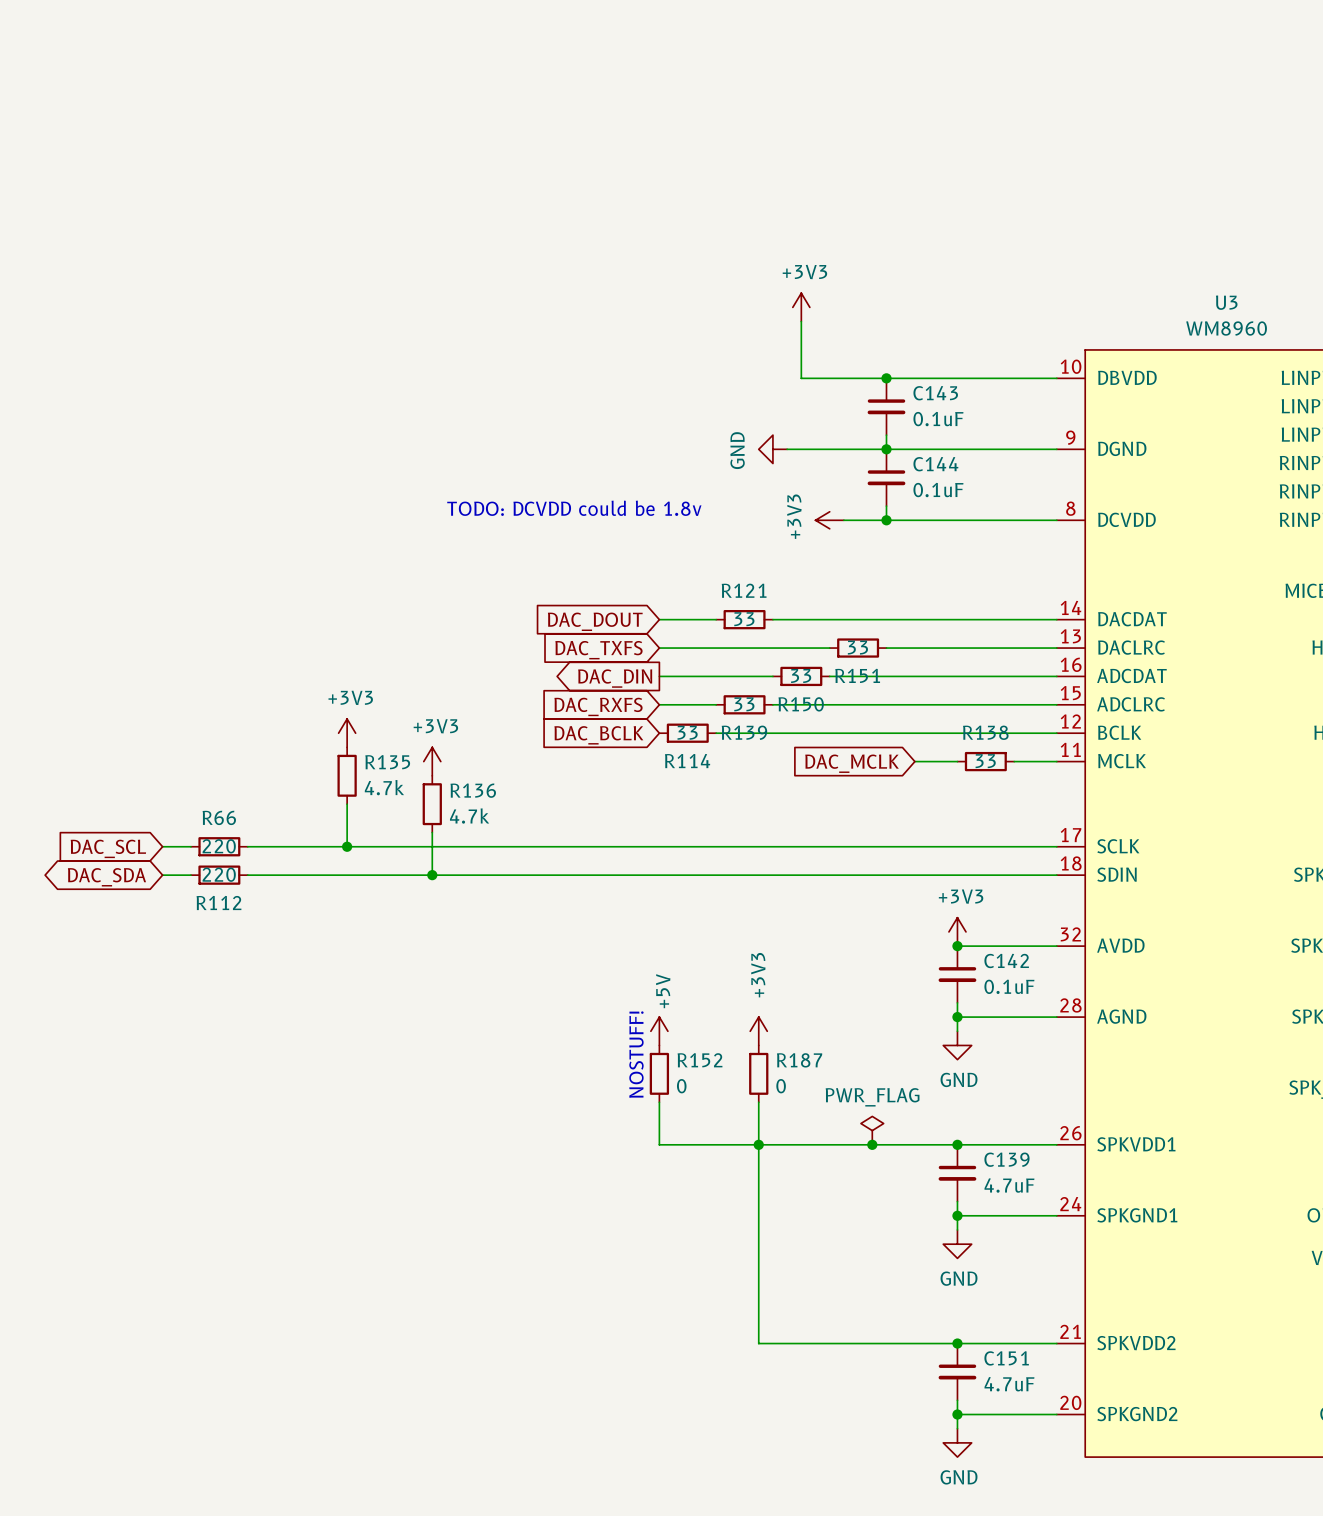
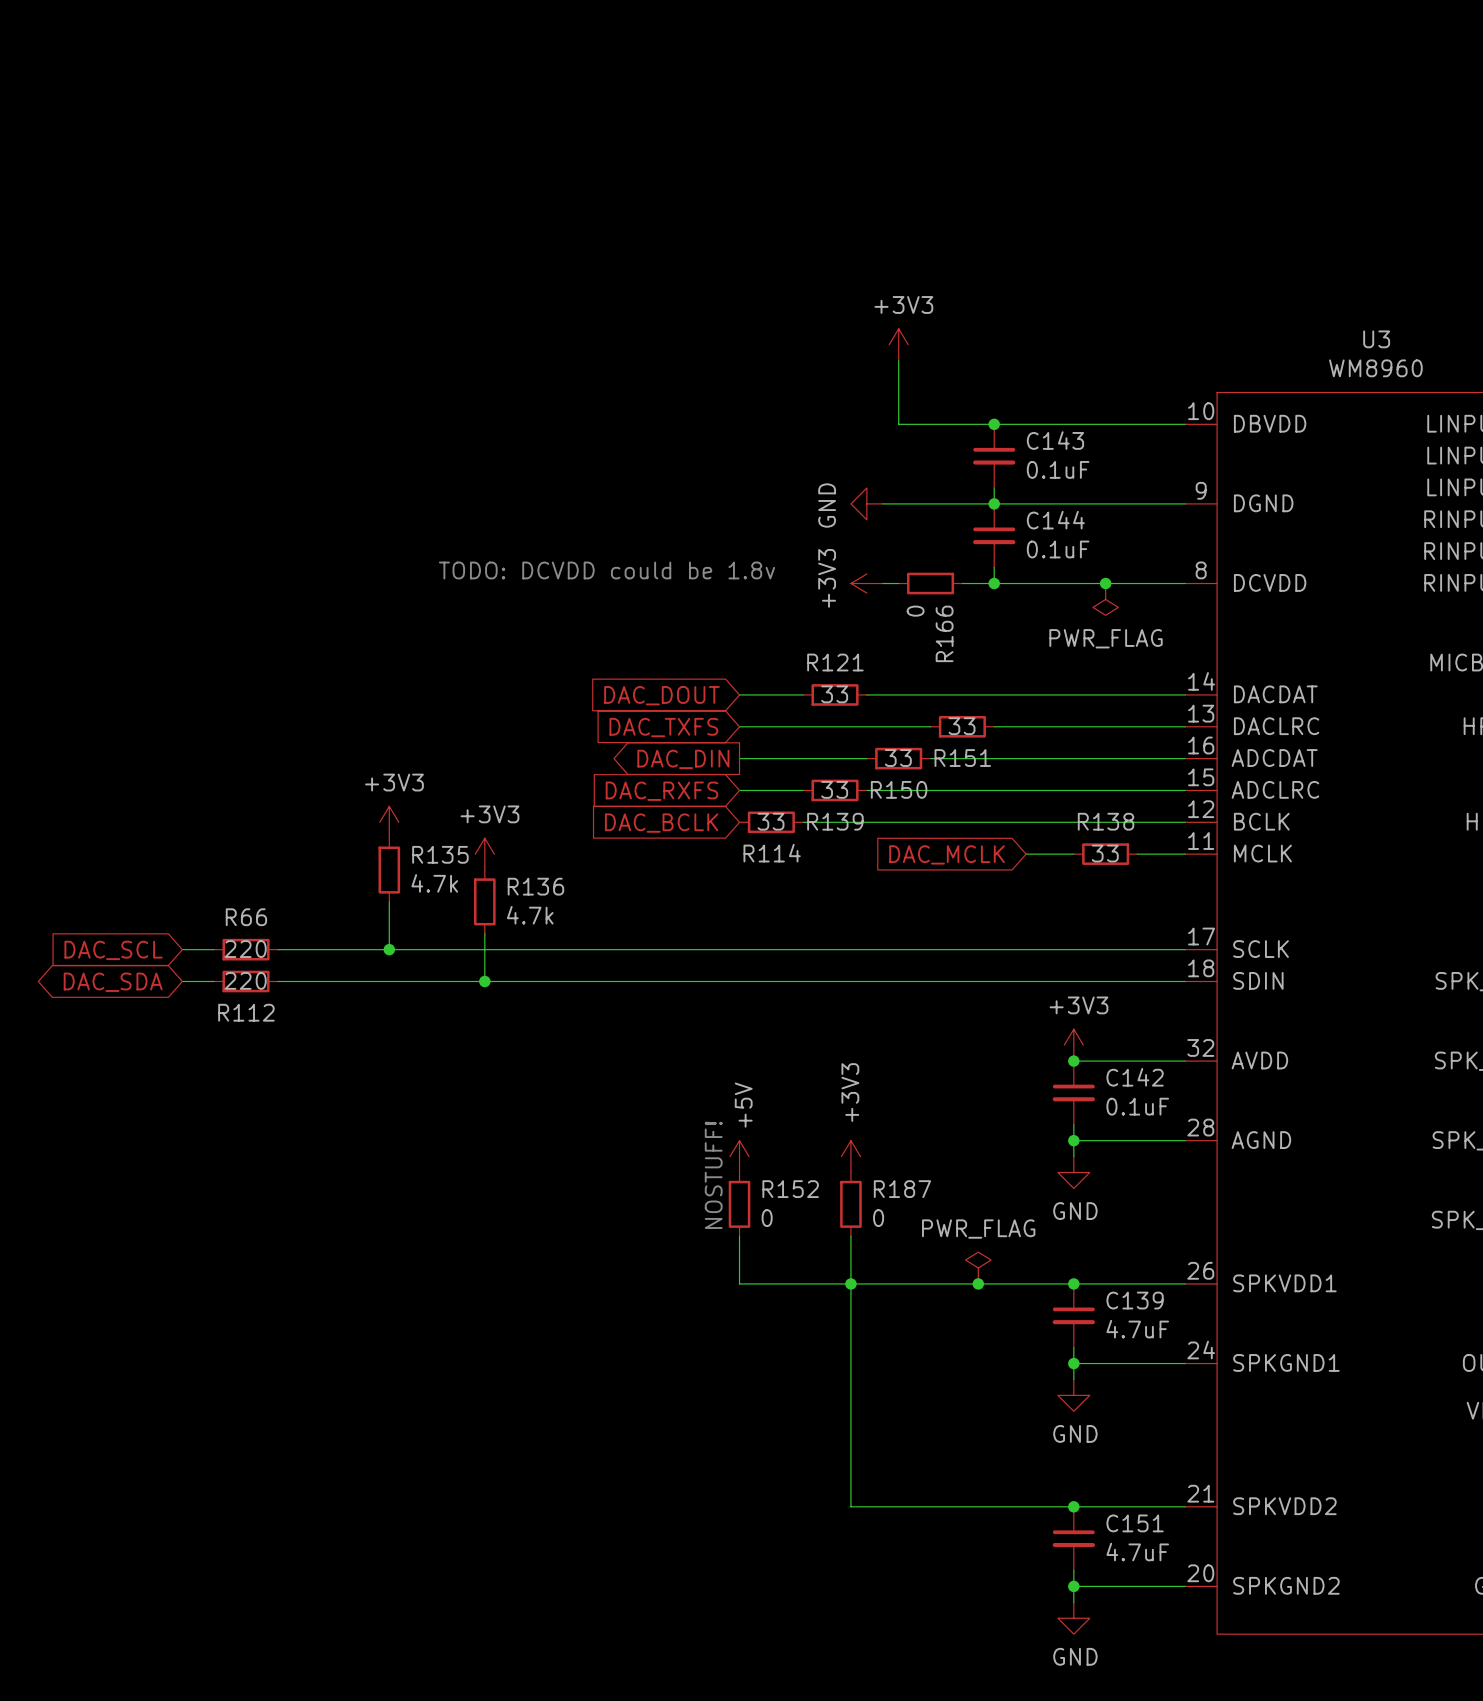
text position: TODO: DCVDD could be 1.8v (574, 508) -> TODO: DCVDD could be 1.8v (606, 570)
power symbol position: +3V3 (829, 520) -> +3V3 (866, 583)
R166: none -> 0 (930, 583)
junction: none -> (1105, 583)
power symbol: none -> PWR_FLAG (1105, 599)

